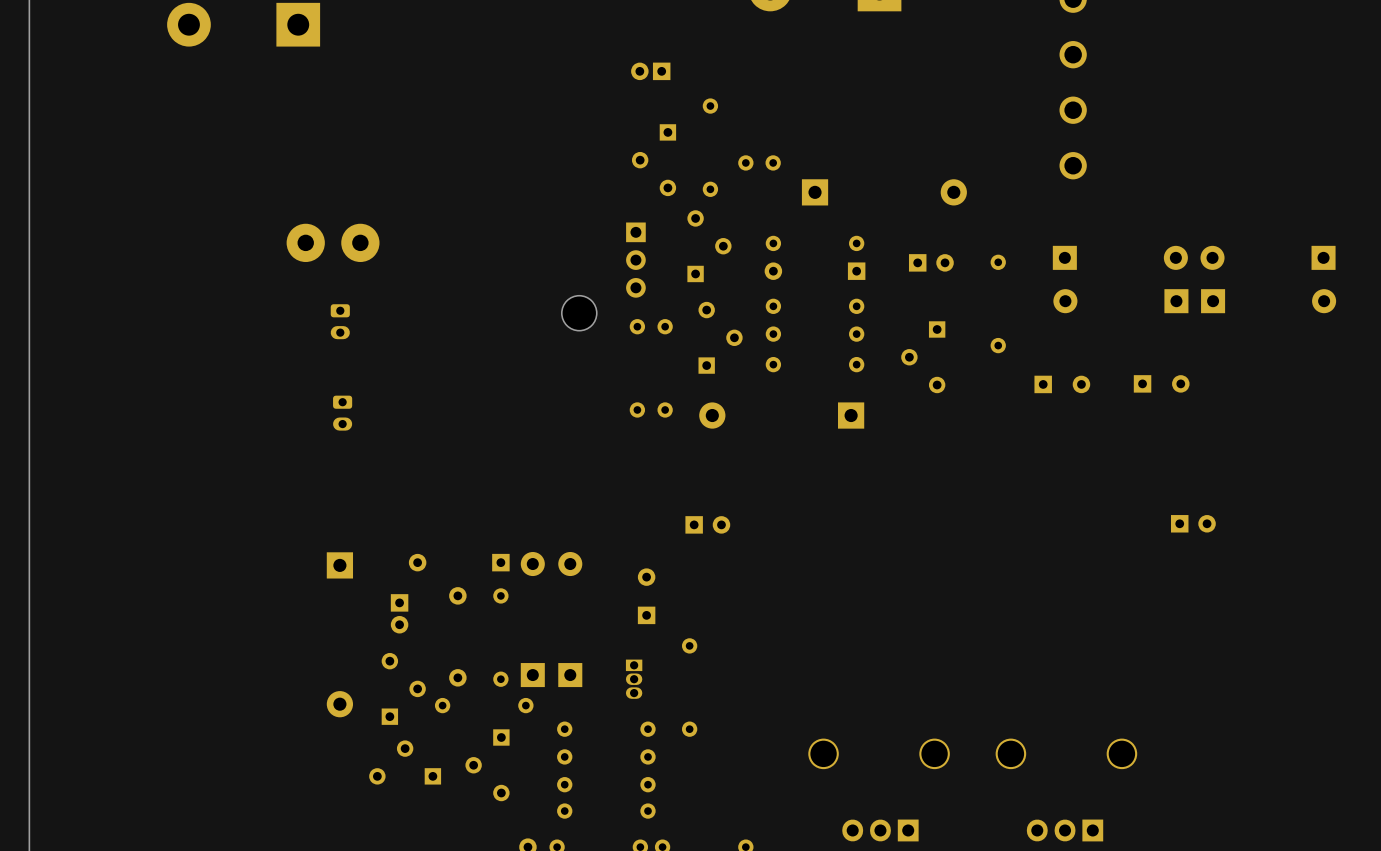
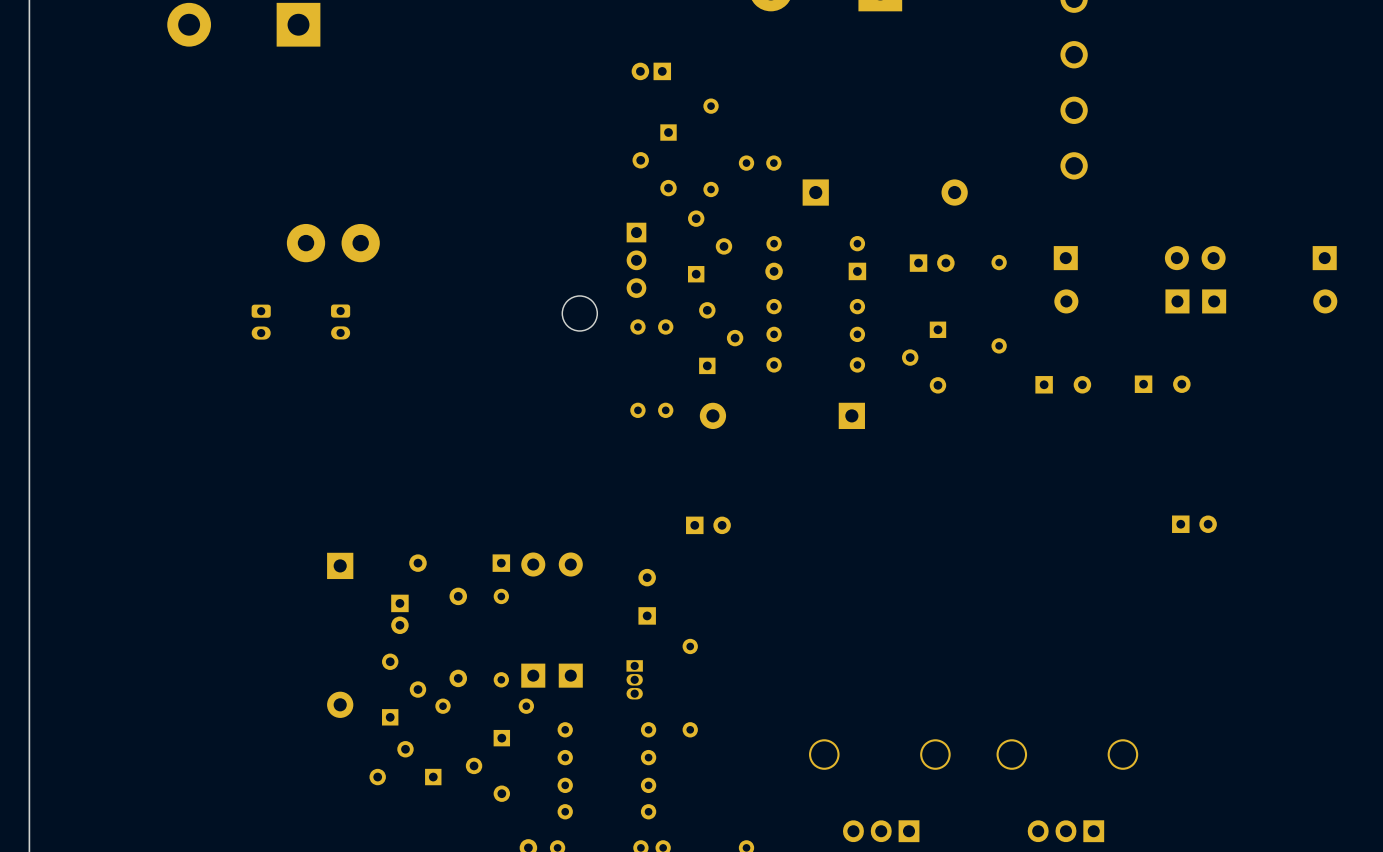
part position: (342, 413) -> (261, 322)

